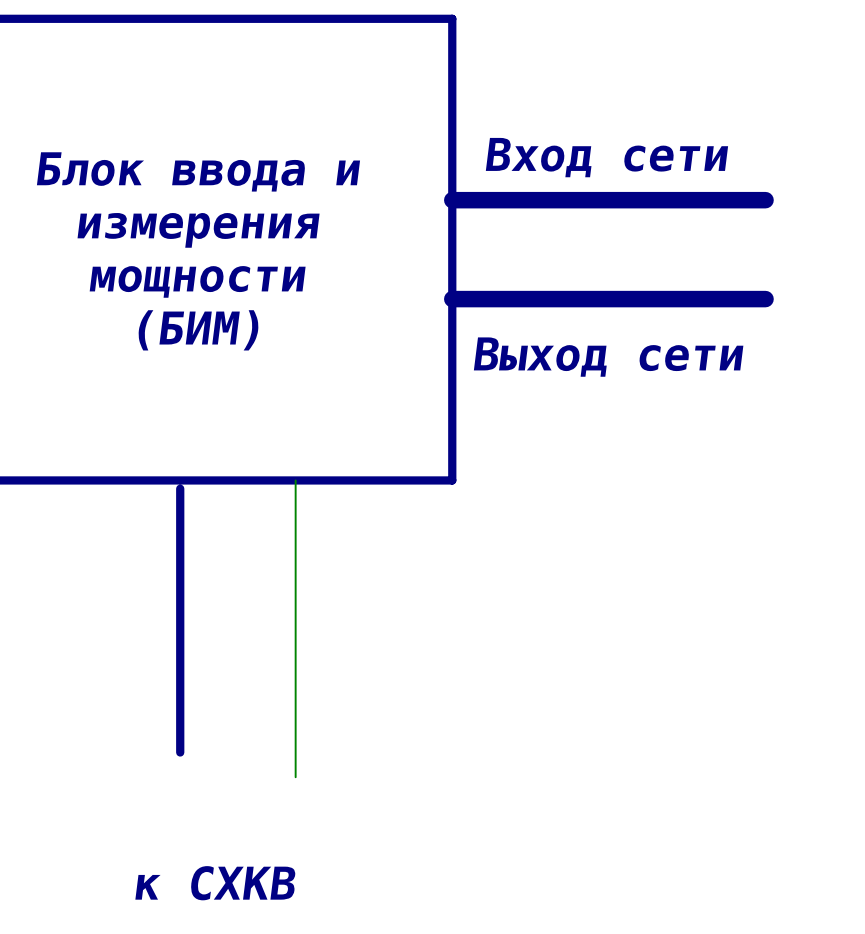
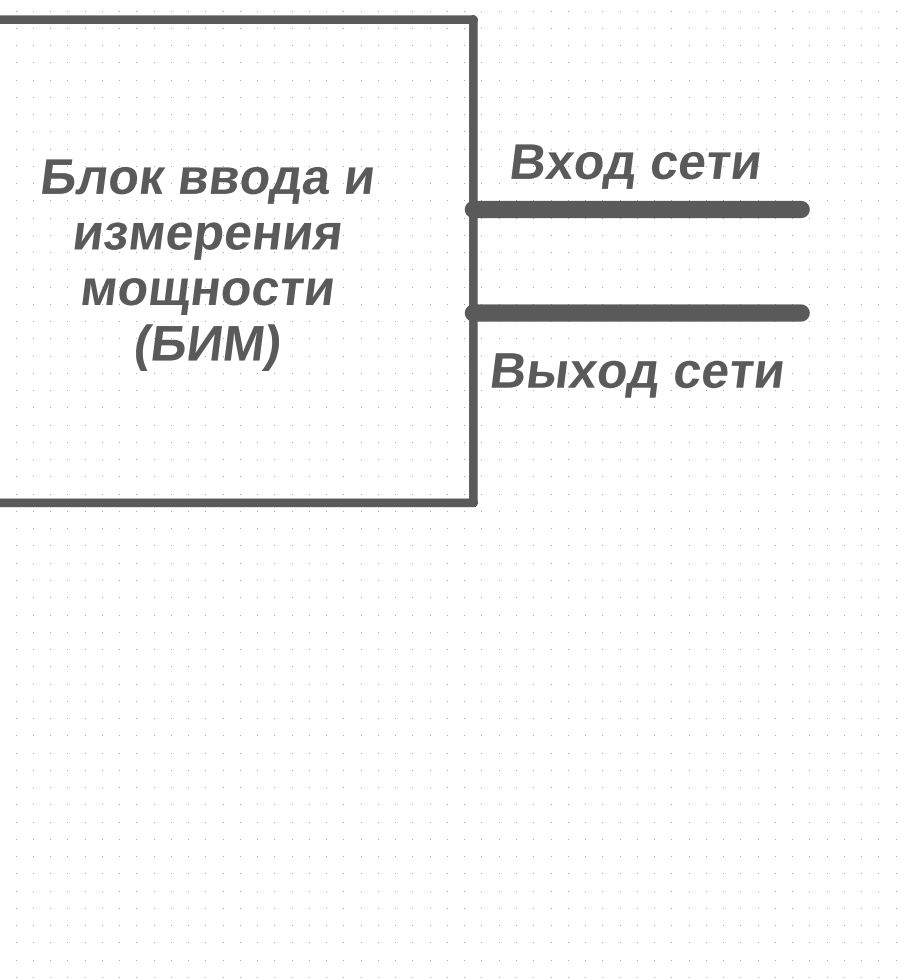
wire: (295, 480) (295, 777) -> none
line: (180, 488) (180, 752) -> none
text: к СХКВ (215, 883) -> none

